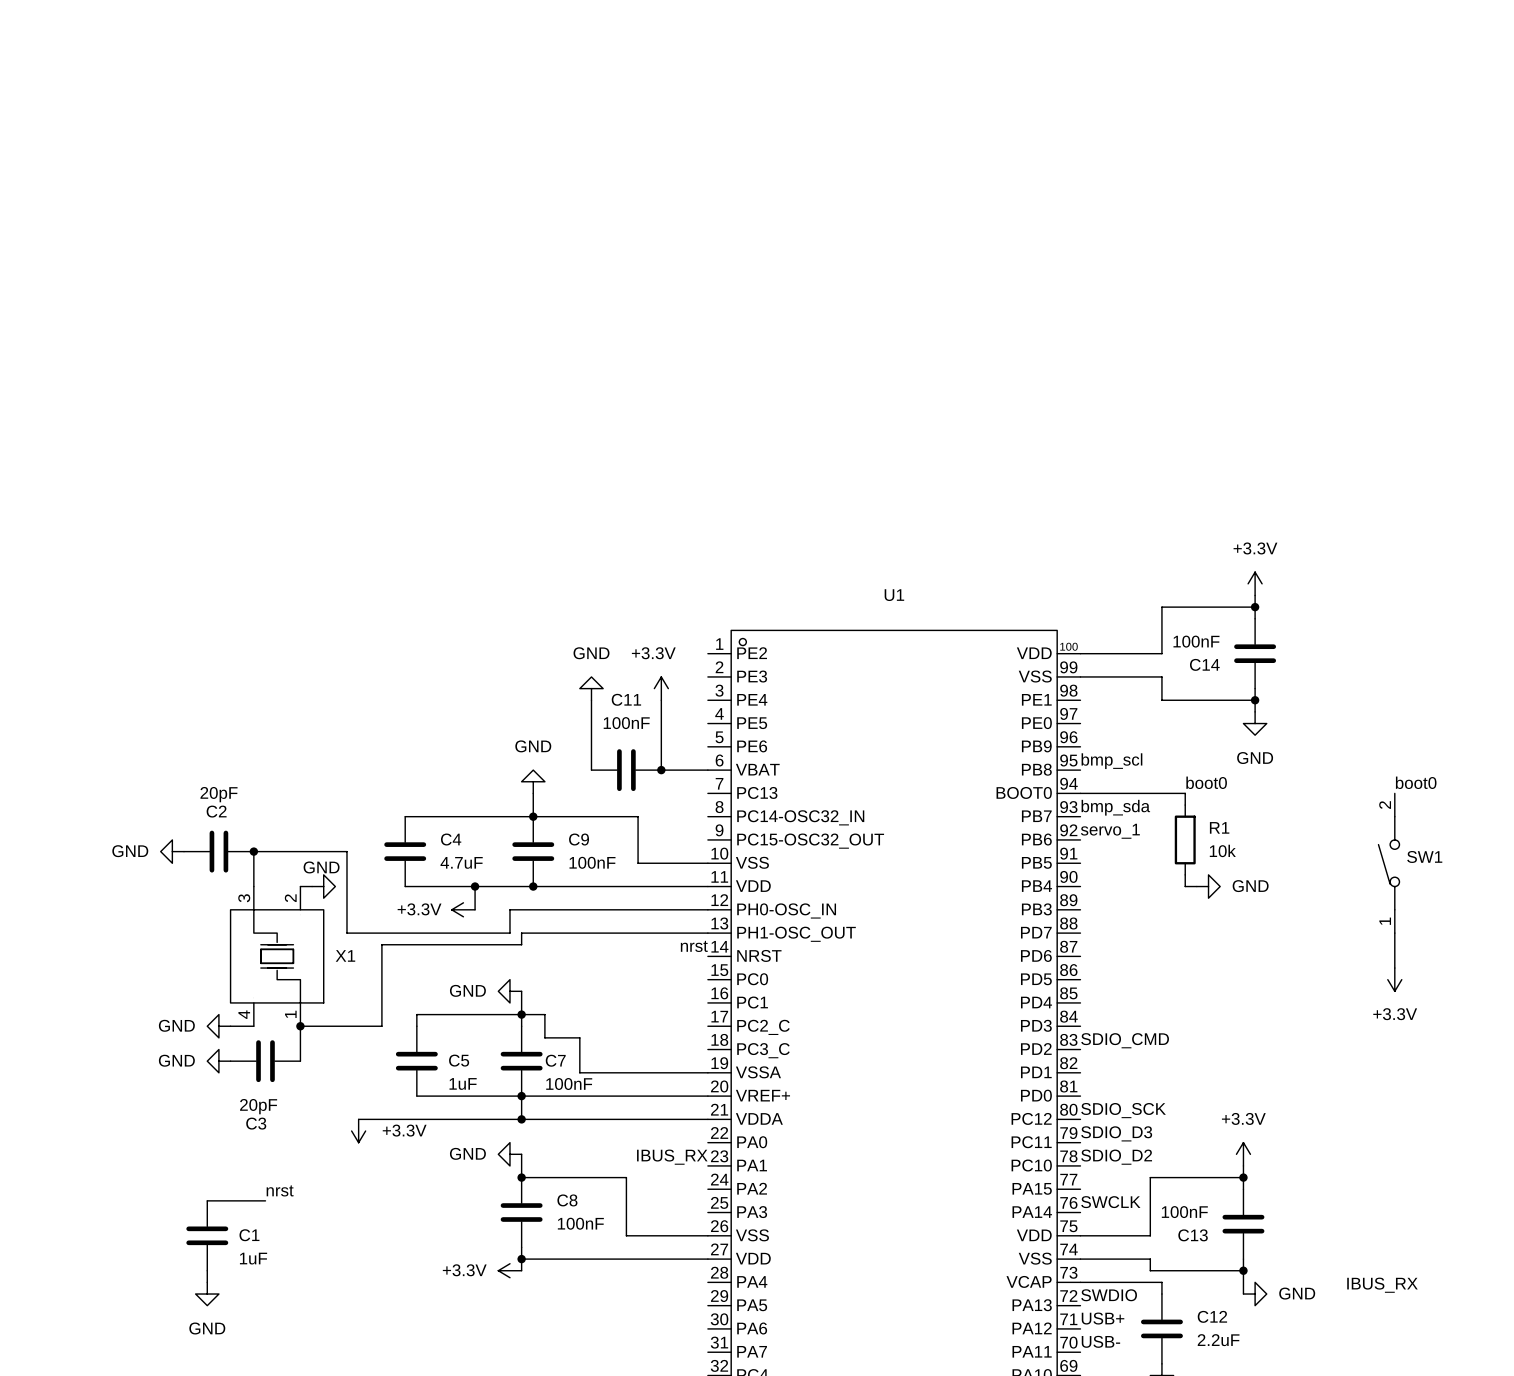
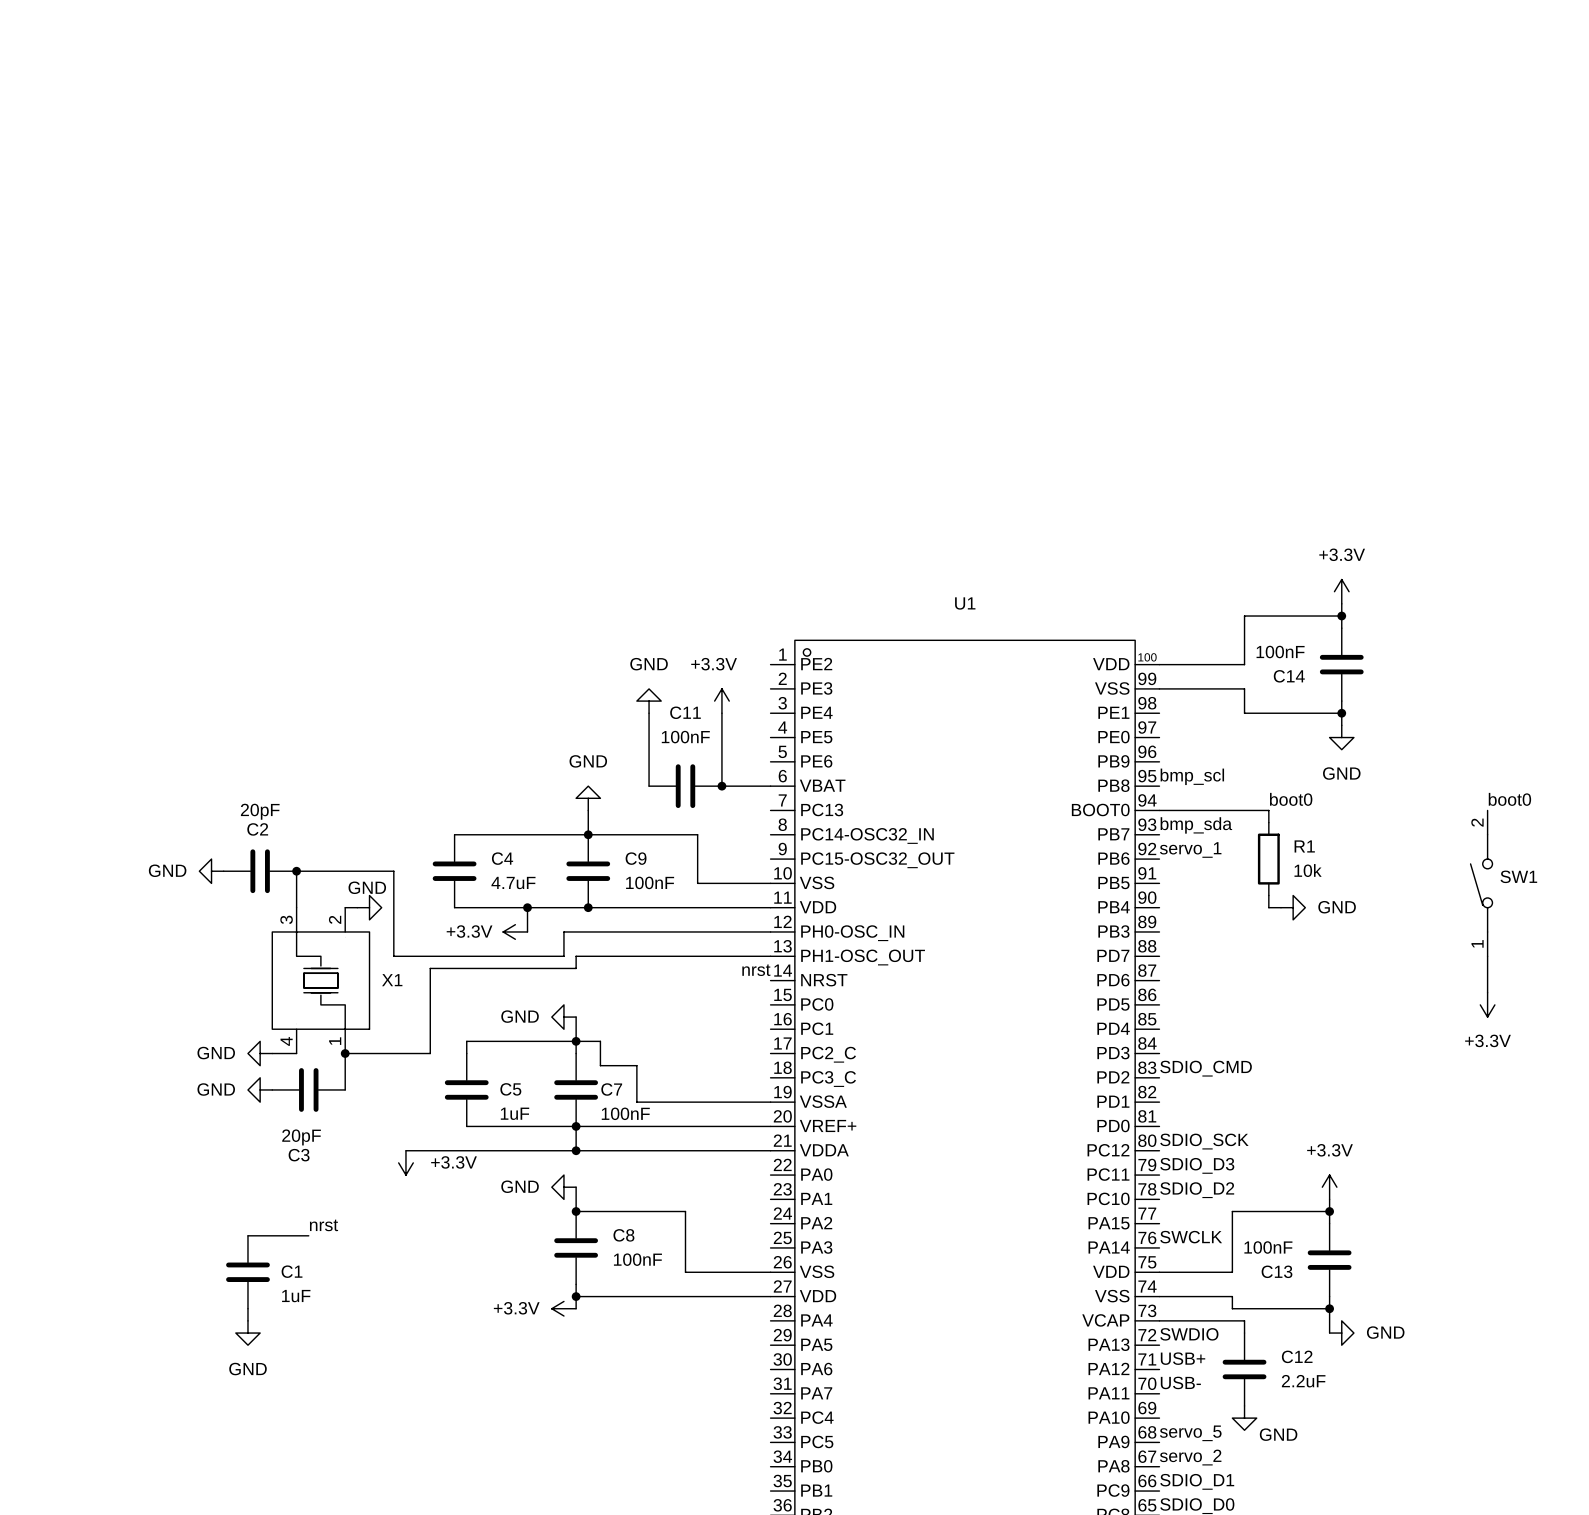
label: IBUS_RX (672, 1157) -> none
label: IBUS_RX (1382, 1285) -> none

